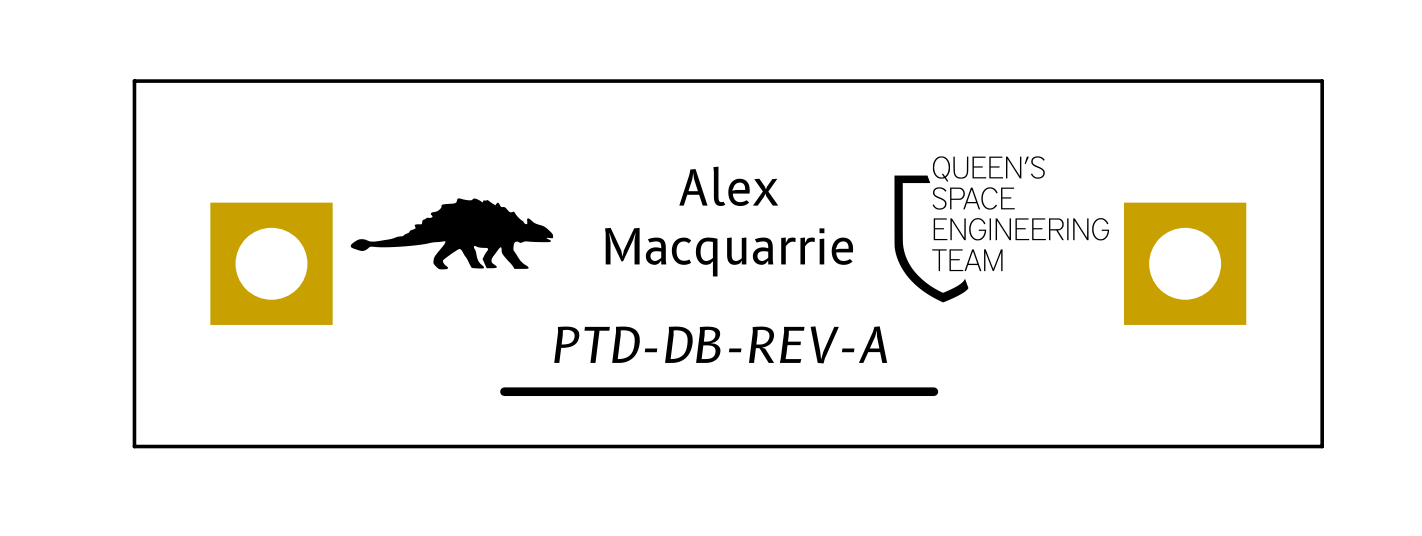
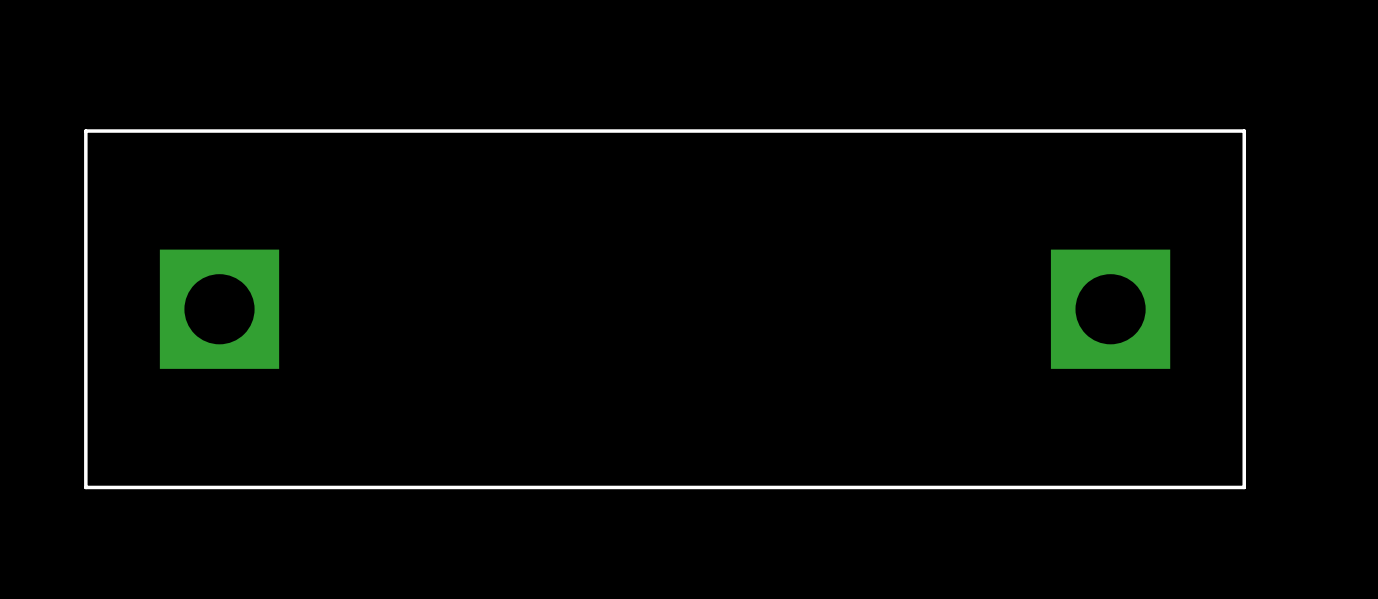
drawing: [894, 156, 1110, 303] -> none
text: Alex (728, 186) -> none
drawing: [350, 198, 554, 270] -> none
text: Macquarrie (729, 252) -> none
text: PTD-DB-REV-A (720, 344) -> none
line: (933, 391) (504, 391) -> none

